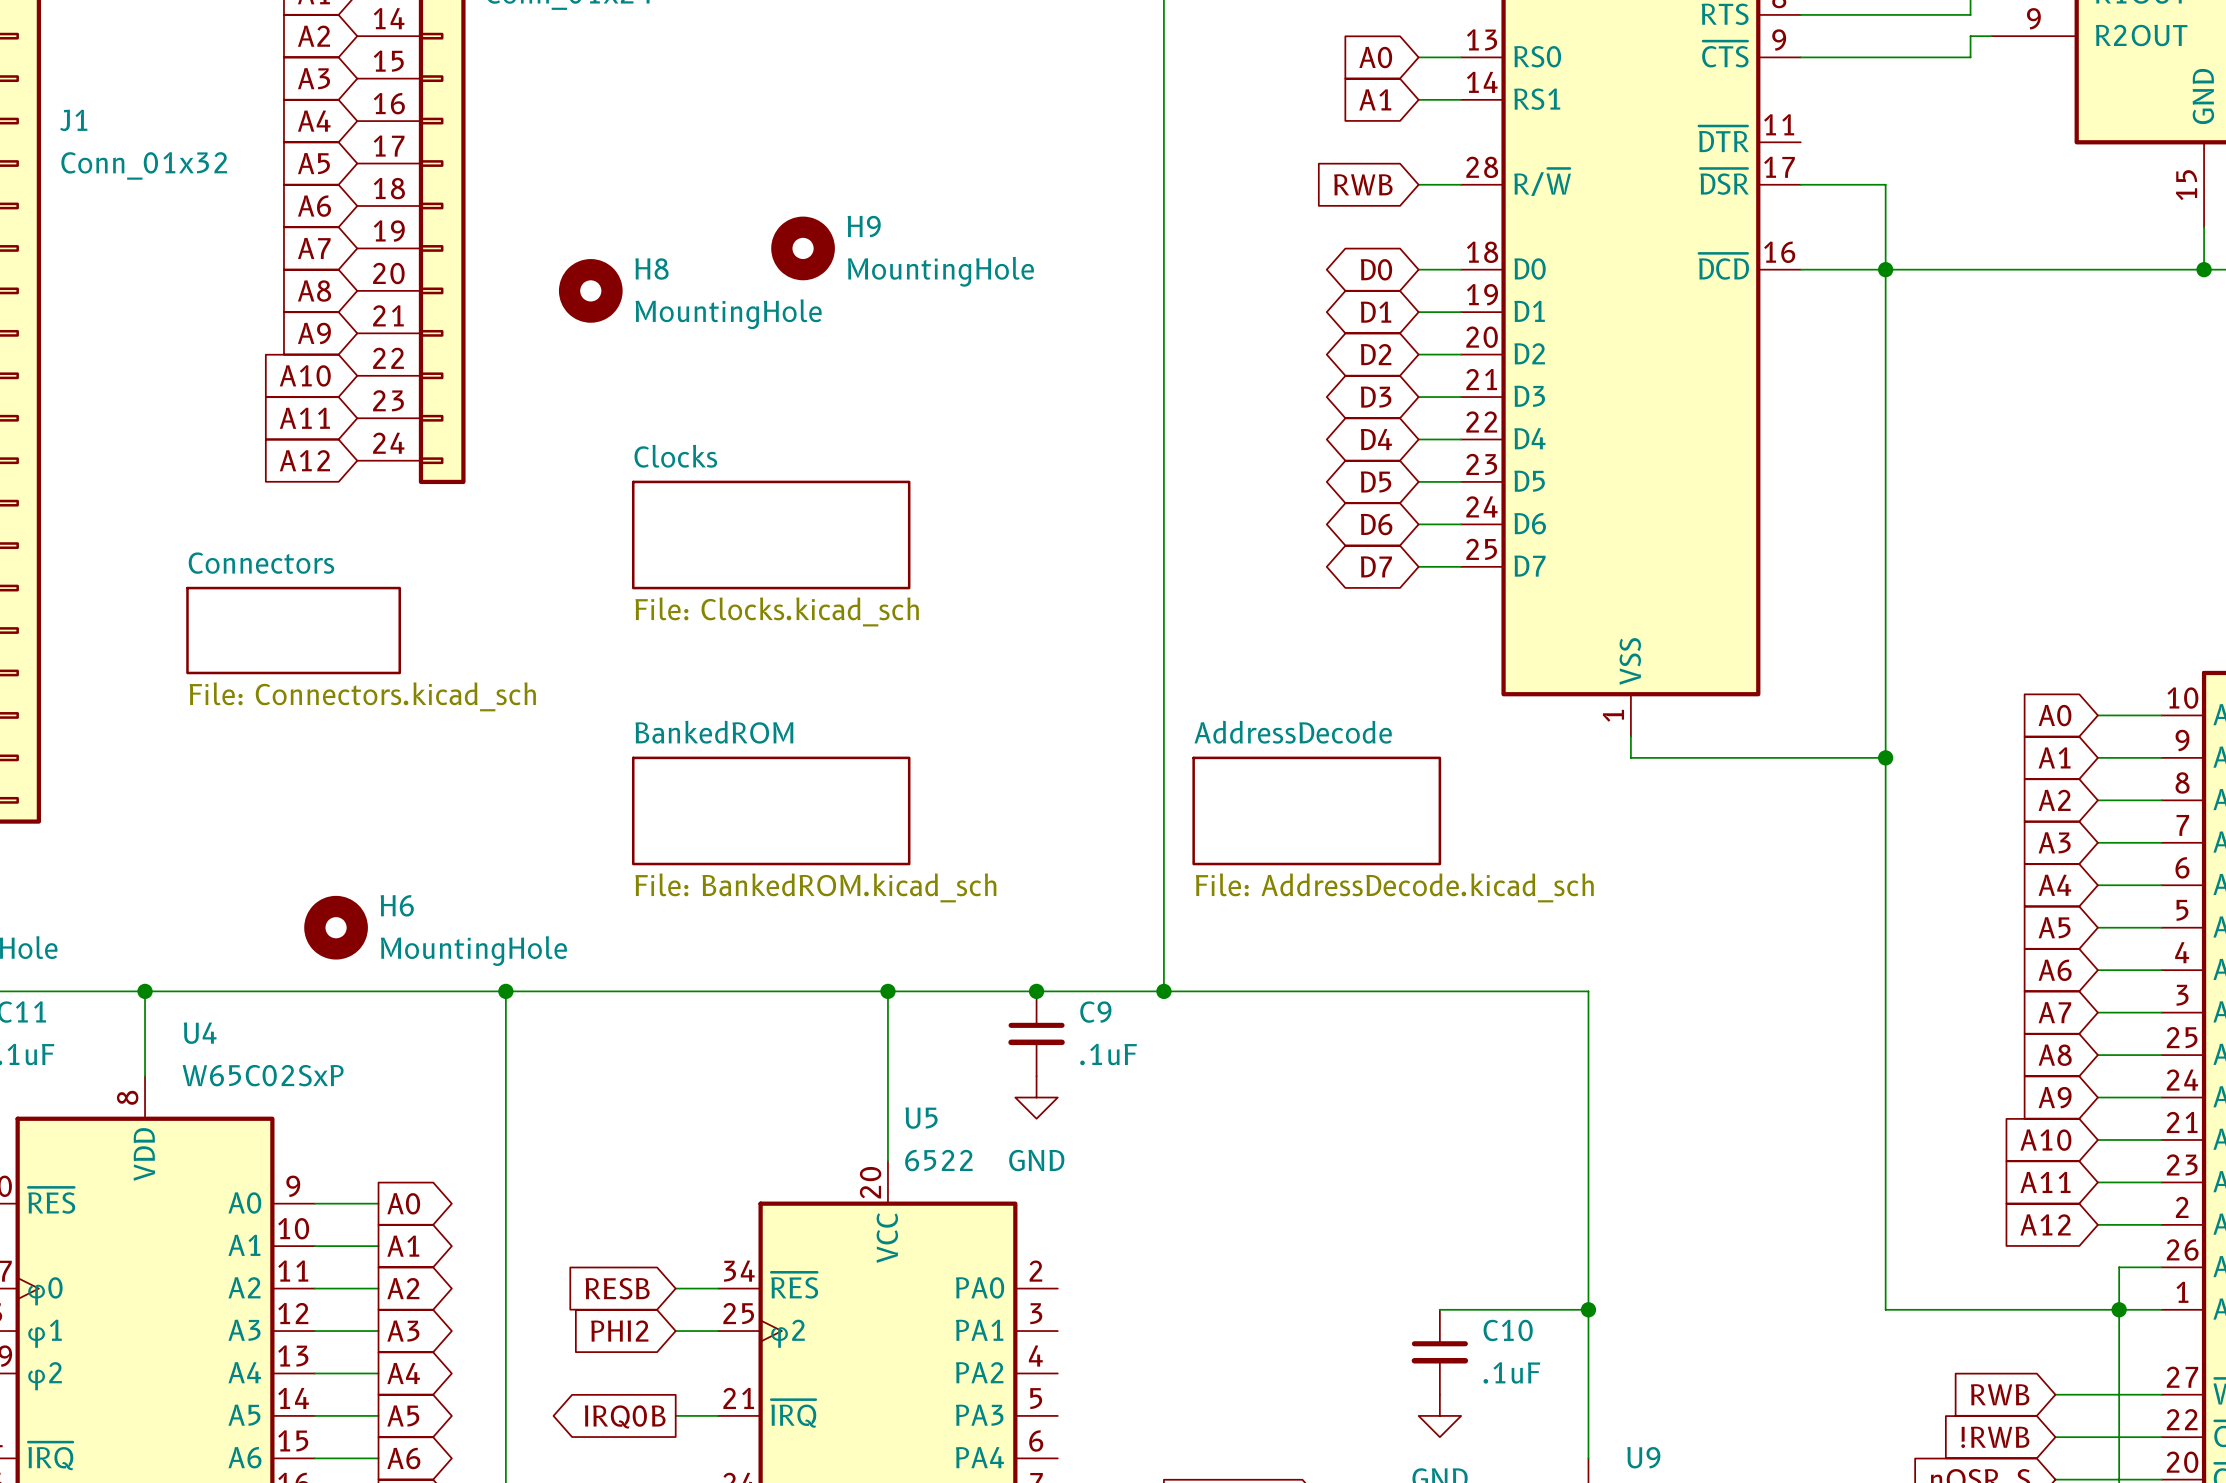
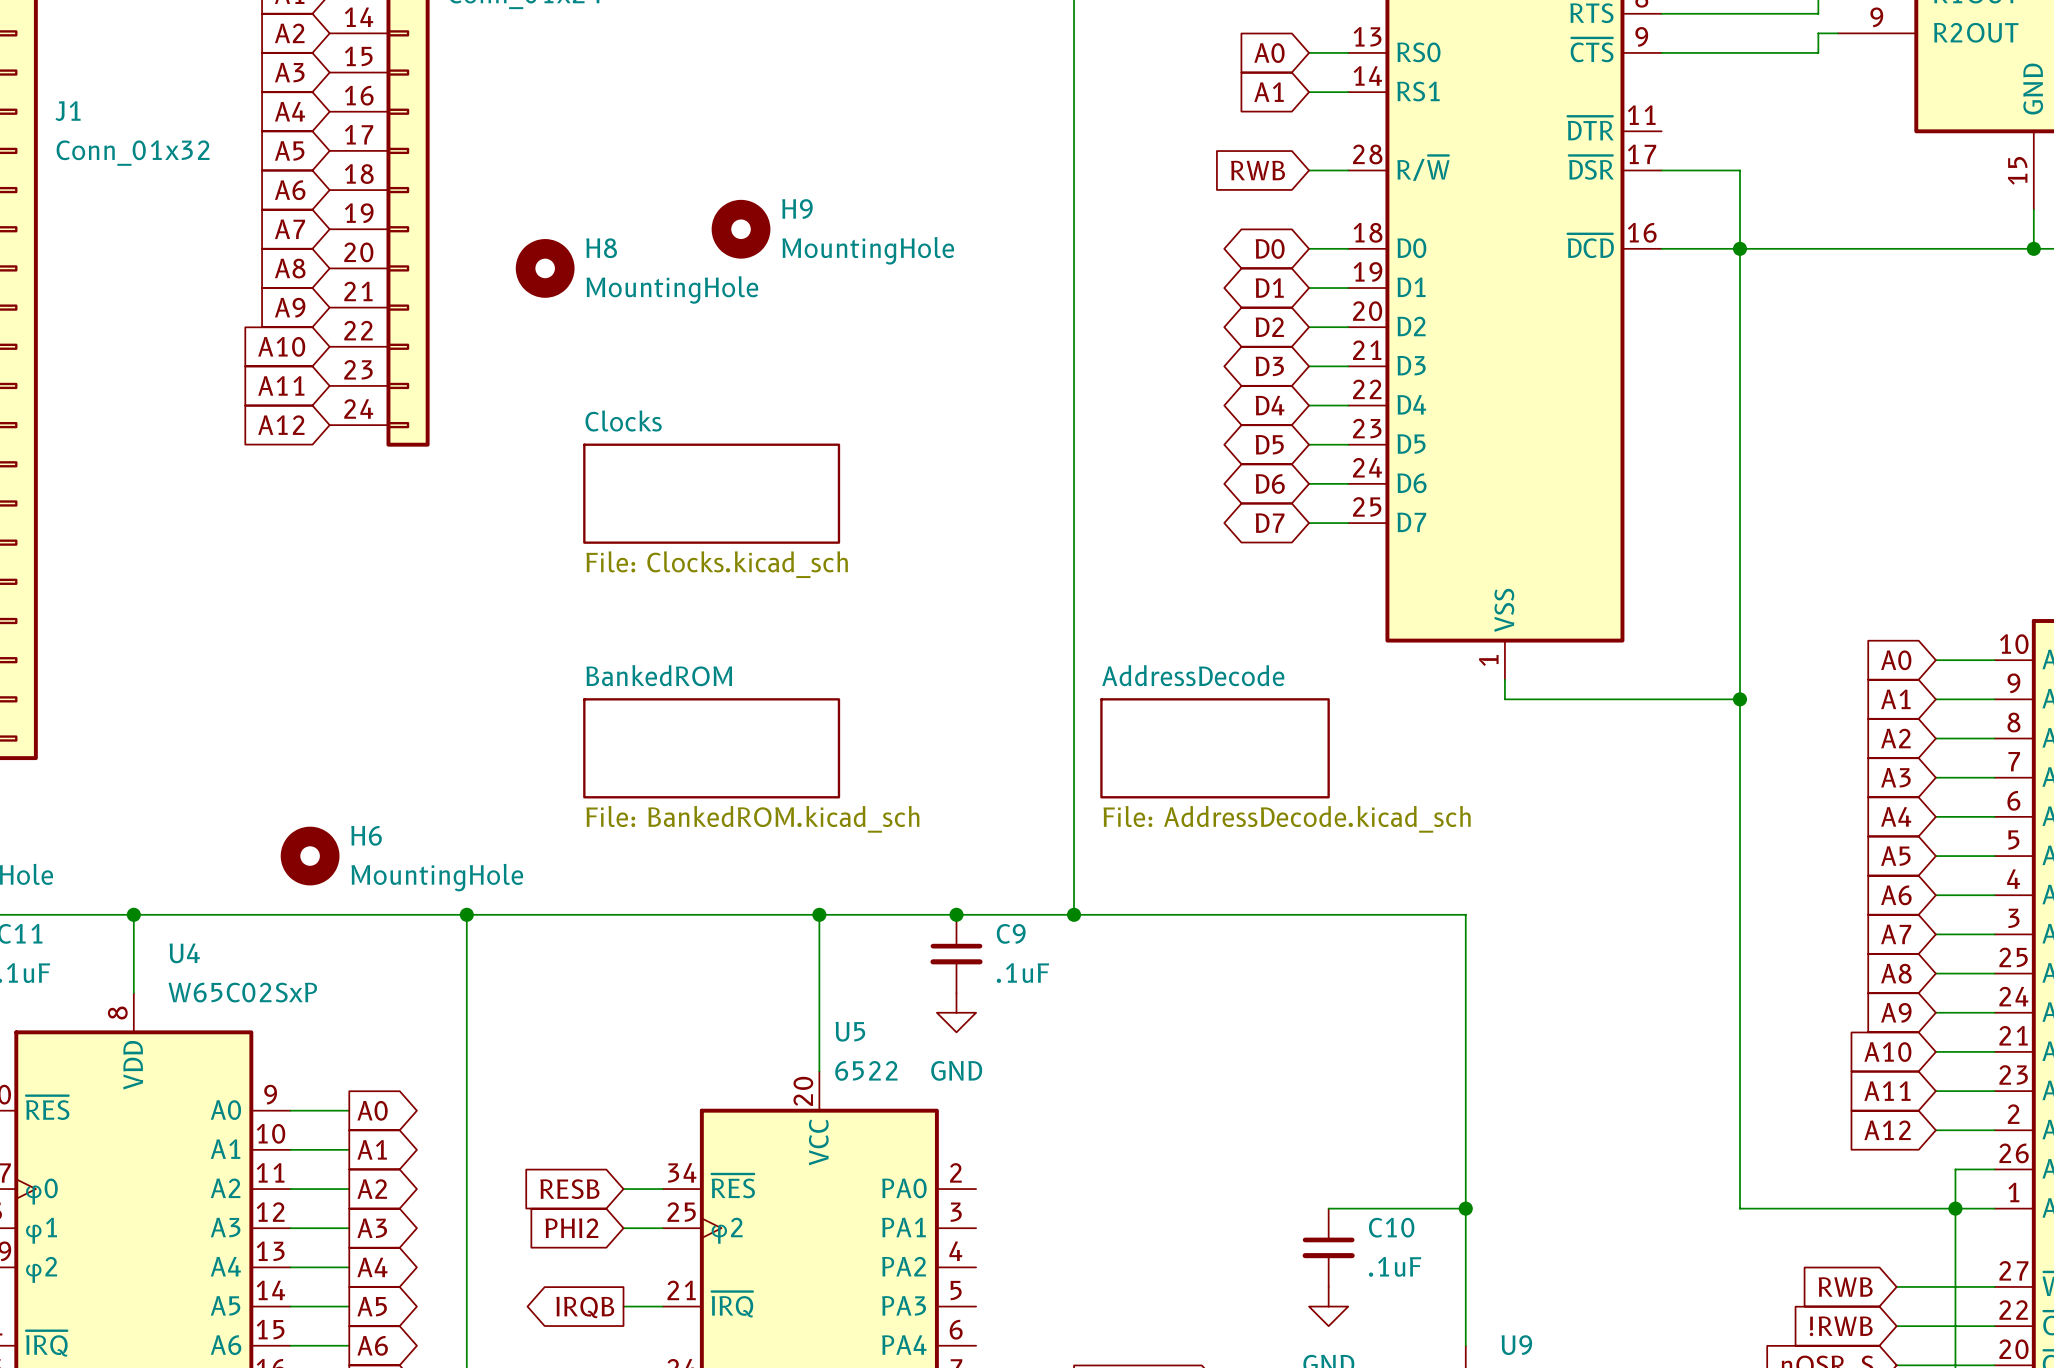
sheet Connectors: File: Connectors.kicad_sch (293, 630) -> none
global label: IRQ0B (625, 1416) -> IRQB (585, 1307)

